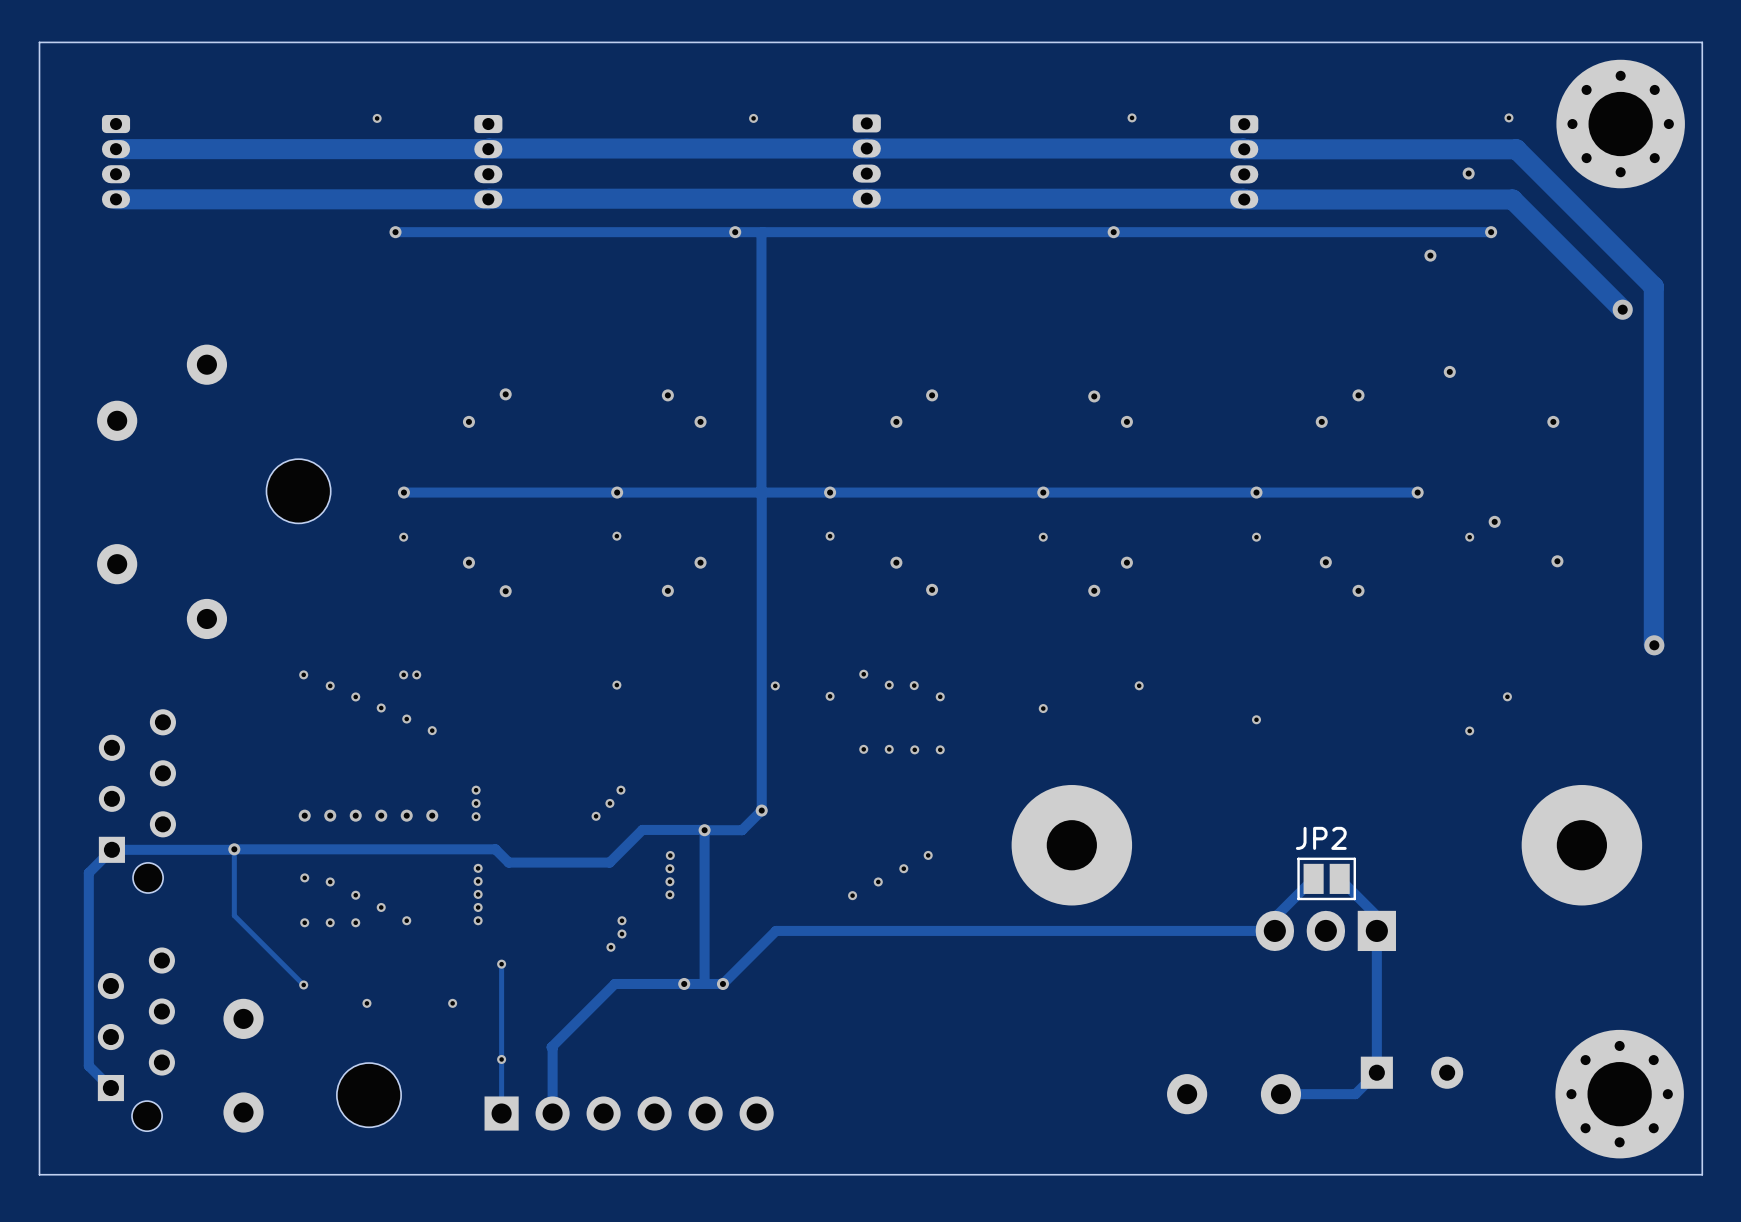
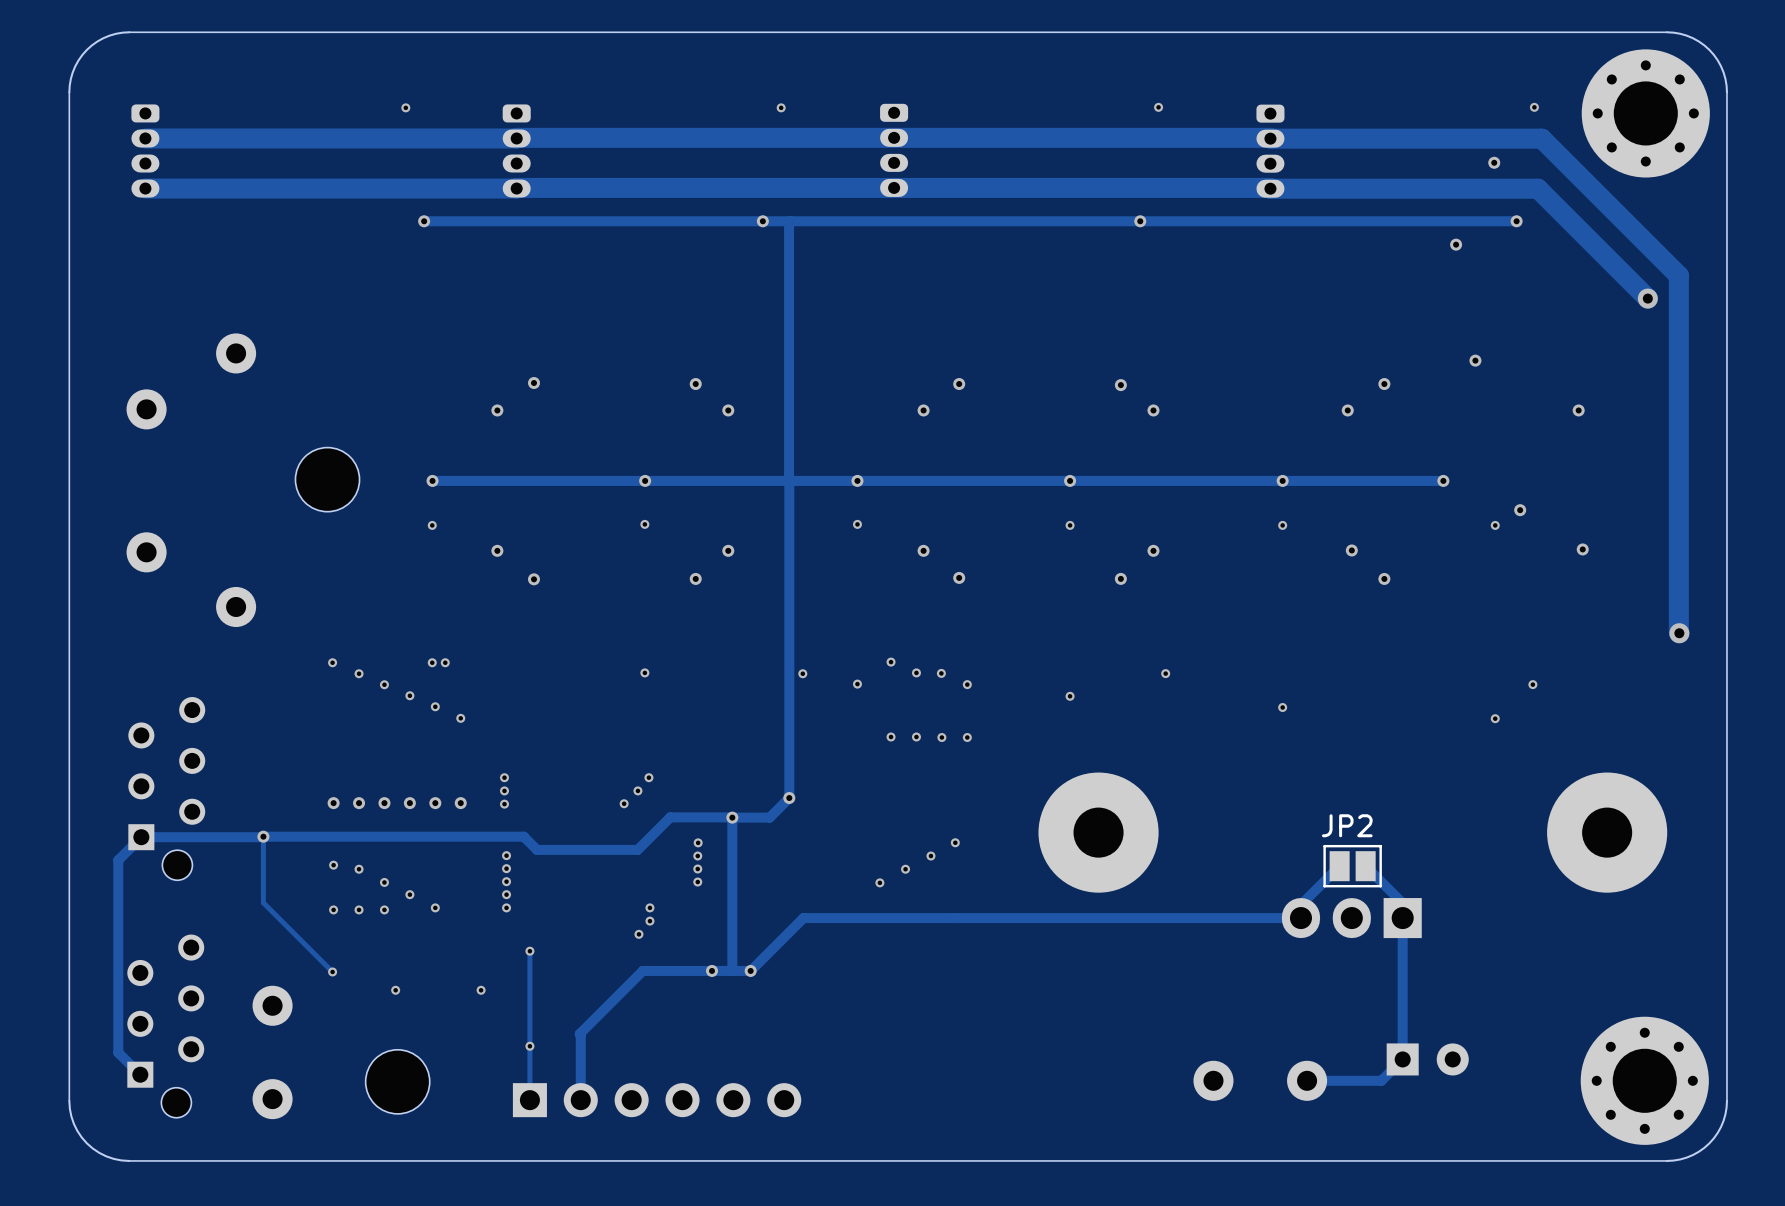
board edge: (1702, 42) (1702, 1174) (39, 1174) (39, 42) (1702, 42) -> (1666, 32) (1680, 33) (1692, 38) (1709, 49) (1717, 60) (1723, 72) (1726, 92) (1726, 1100) (1723, 1120) (1717, 1132) (1709, 1143) (1698, 1151) (1680, 1159) (1666, 1160) (129, 1160) (106, 1156) (92, 1148) (81, 1137) (73, 1123) (69, 1100) (69, 92) (72, 72) (78, 60) (86, 49) (97, 41) (116, 33) (129, 32) (1666, 32)
part footprint: [1360, 1056, 1464, 1089] -> [1386, 1043, 1469, 1076]

